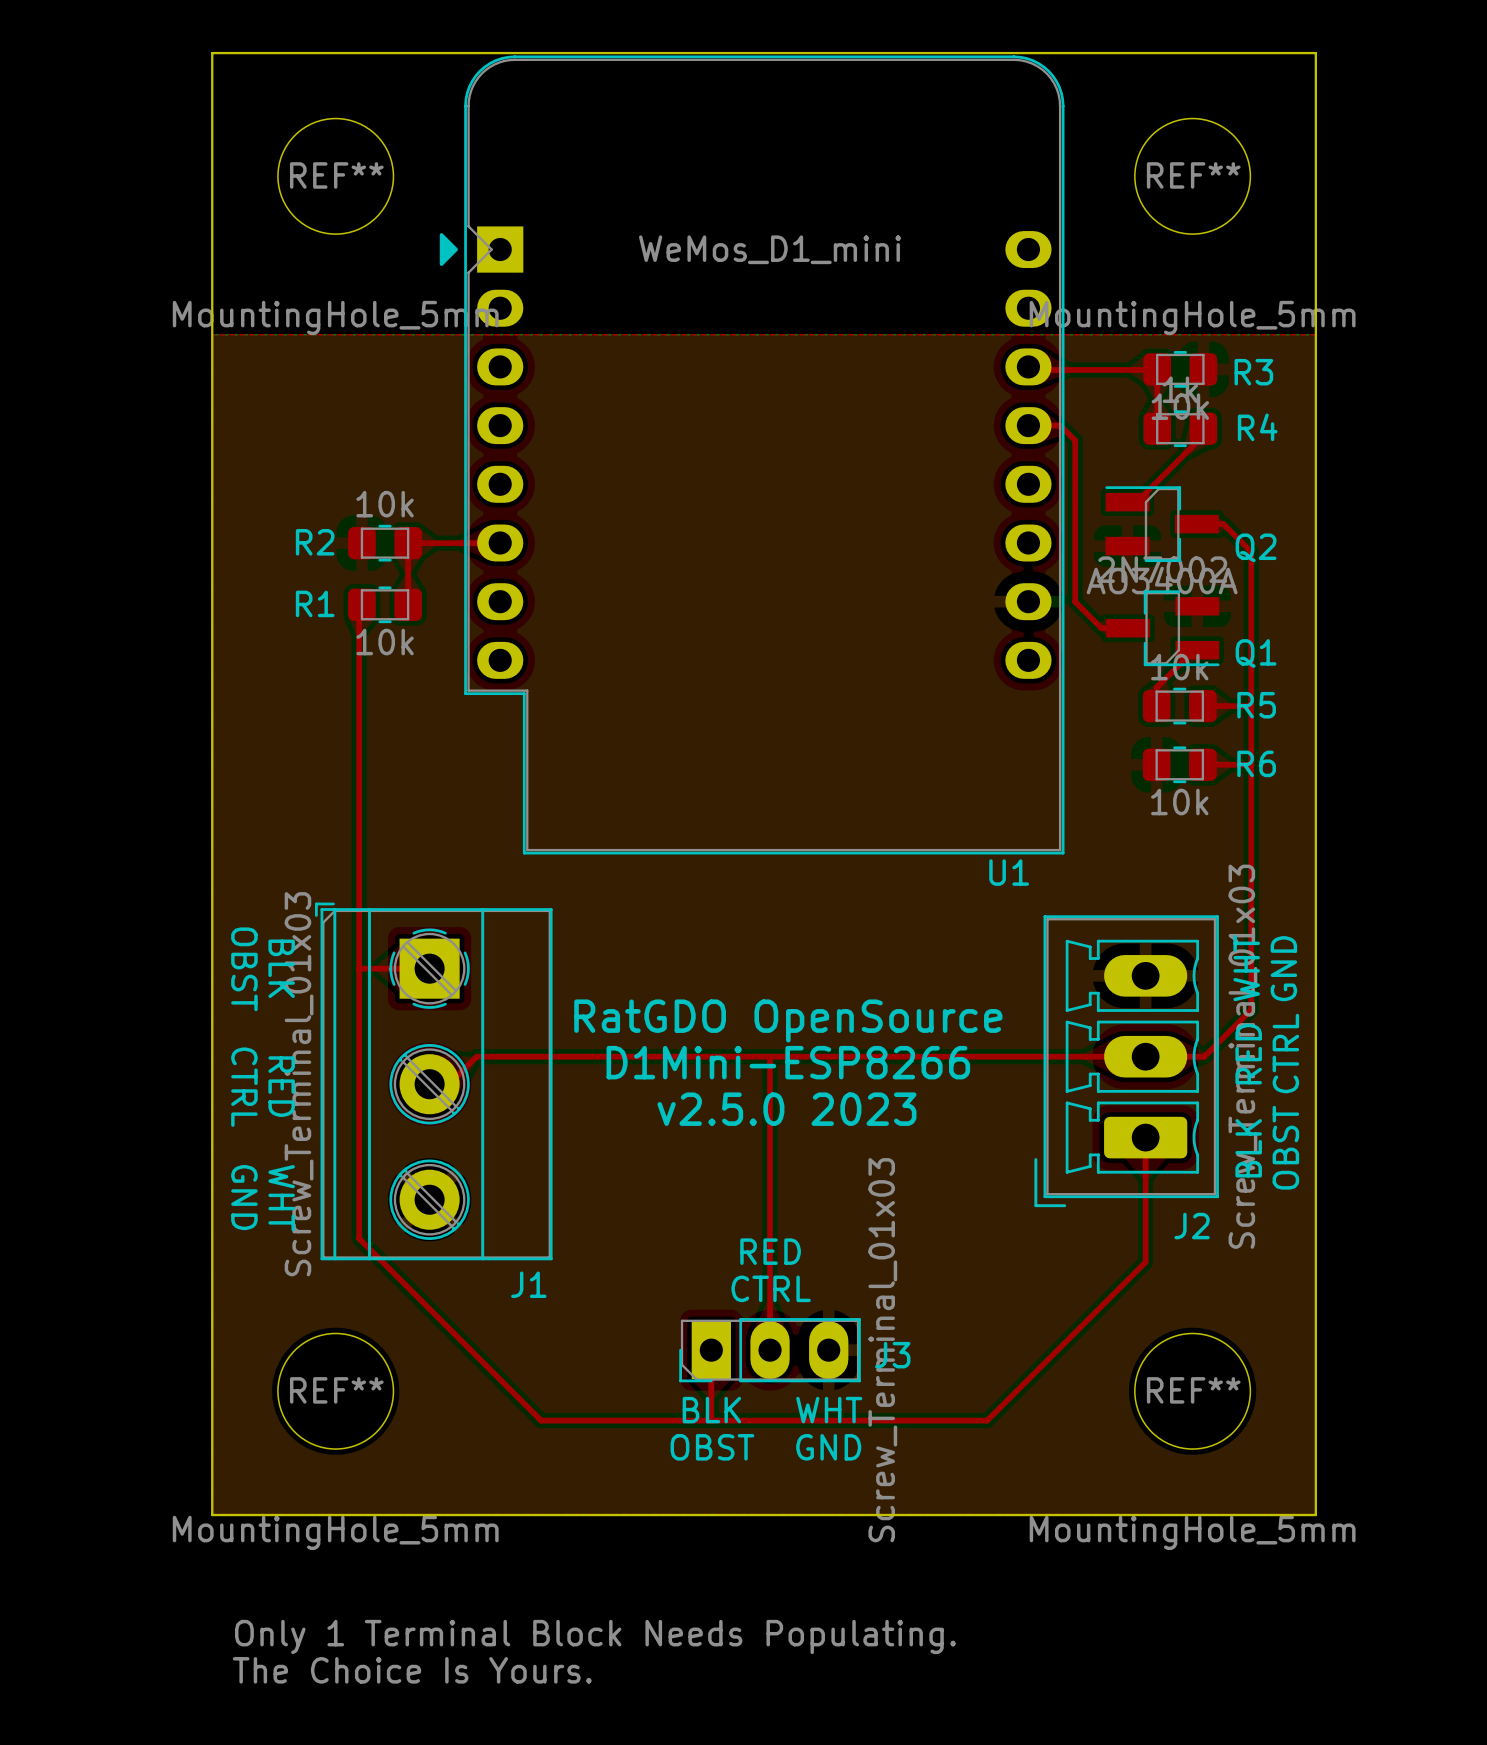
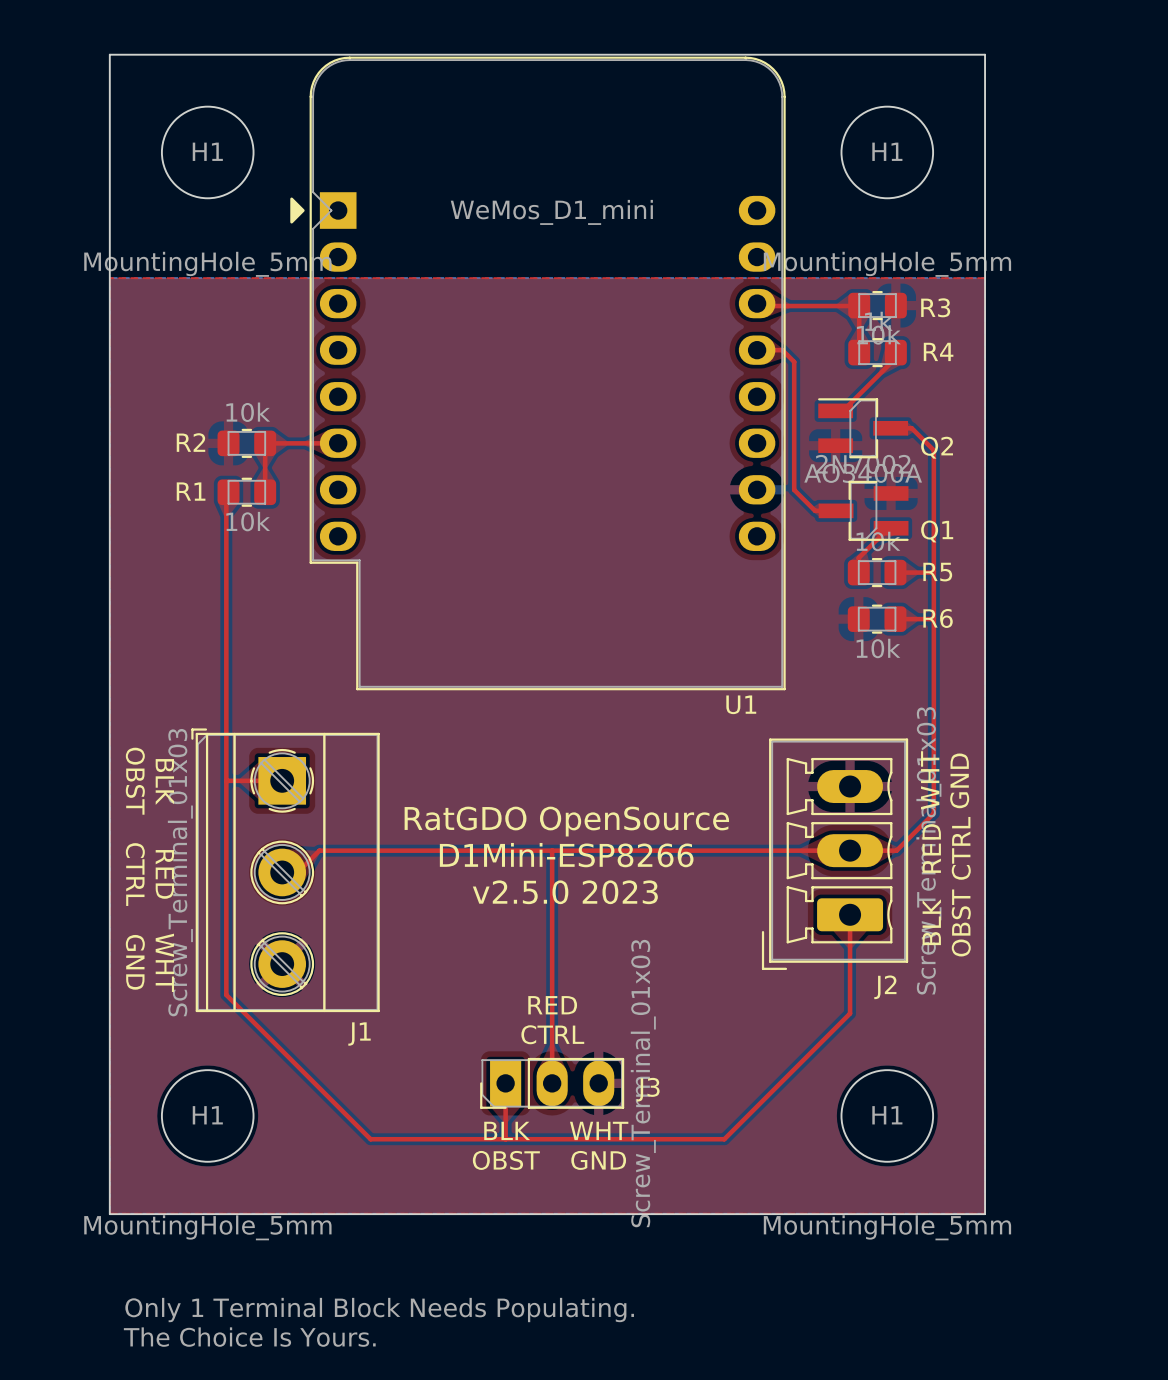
REF** name: REF** (336, 175) -> H1 (207, 151)
REF** name: REF** (1193, 175) -> H1 (887, 151)
REF** name: REF** (336, 1390) -> H1 (207, 1115)
REF** name: REF** (1193, 1390) -> H1 (887, 1115)

